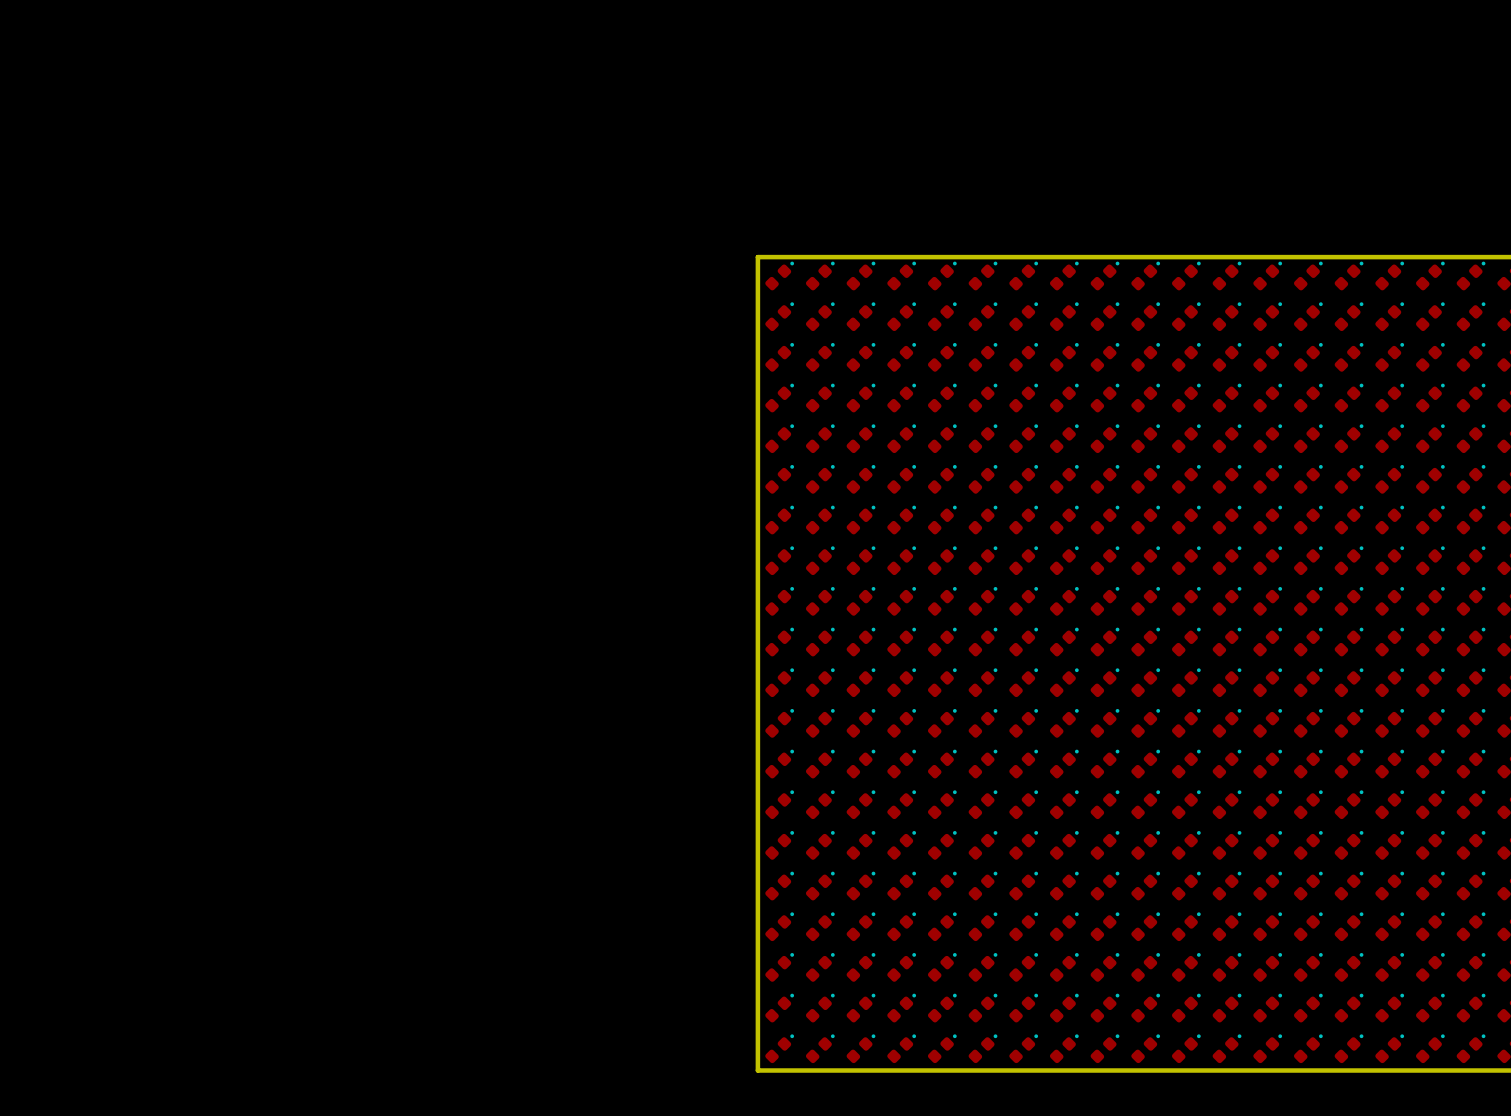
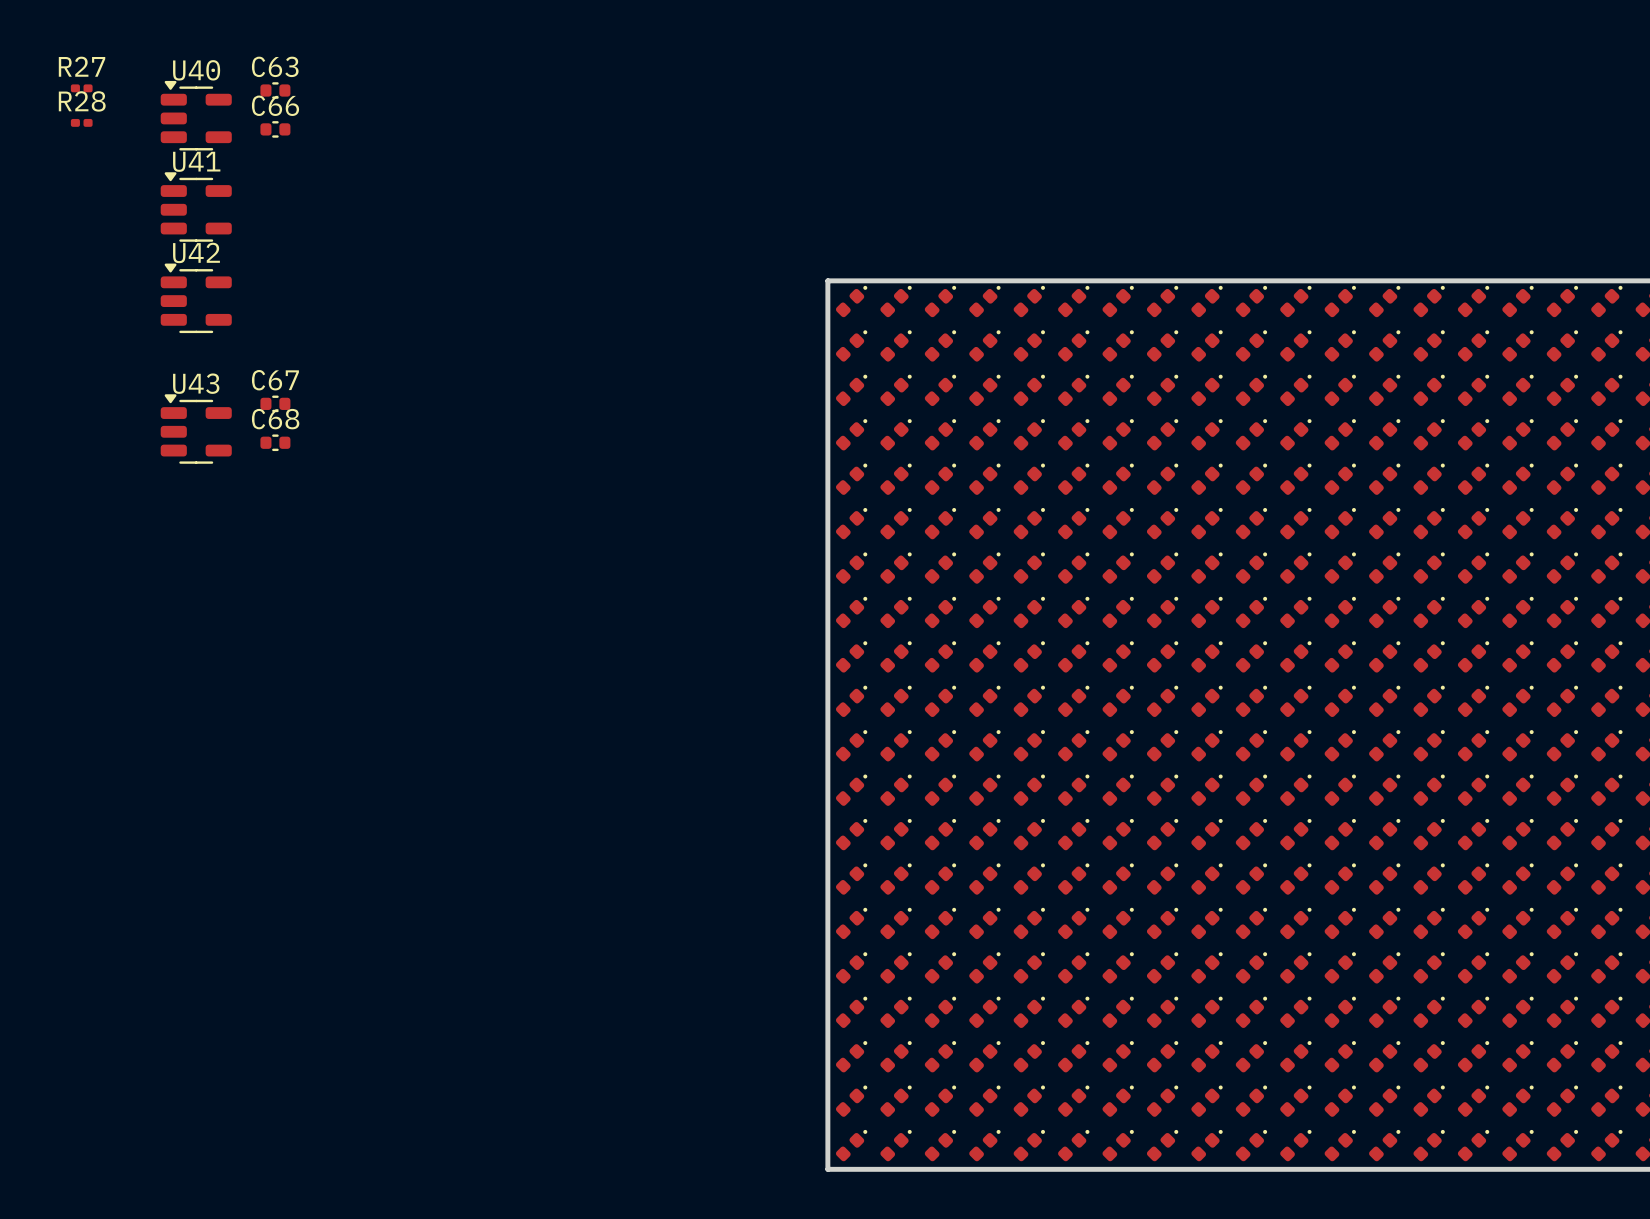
R27: none -> (81, 88)
C63: none -> (275, 90)
U40: none -> (196, 115)
R28: none -> (81, 122)
C66: none -> (275, 129)
U41: none -> (196, 207)
U42: none -> (196, 298)
C67: none -> (275, 403)
U43: none -> (196, 429)
C68: none -> (275, 442)

